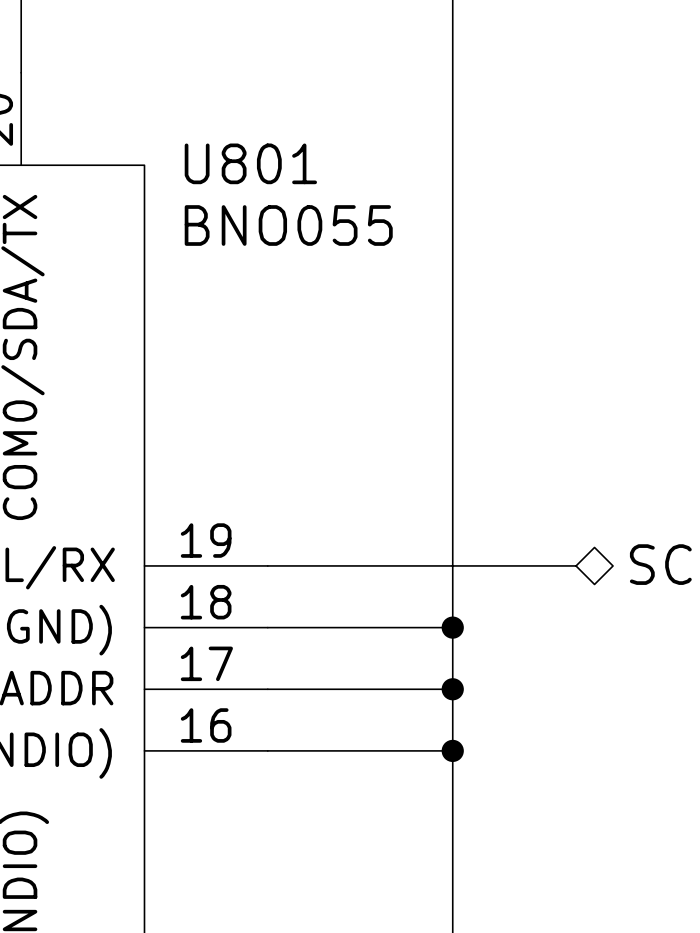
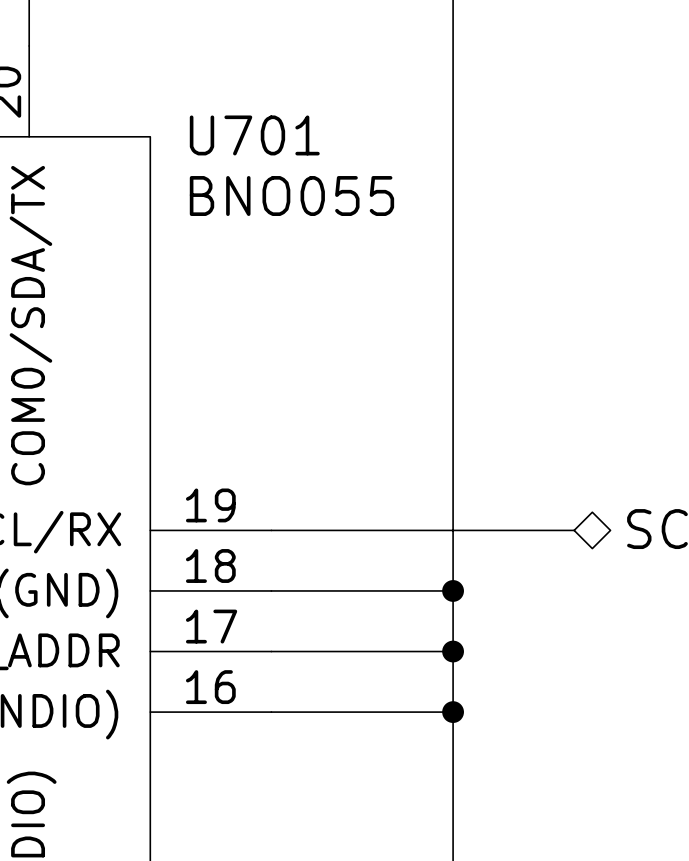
U801 name: U801 (250, 163) -> U701 (254, 135)

